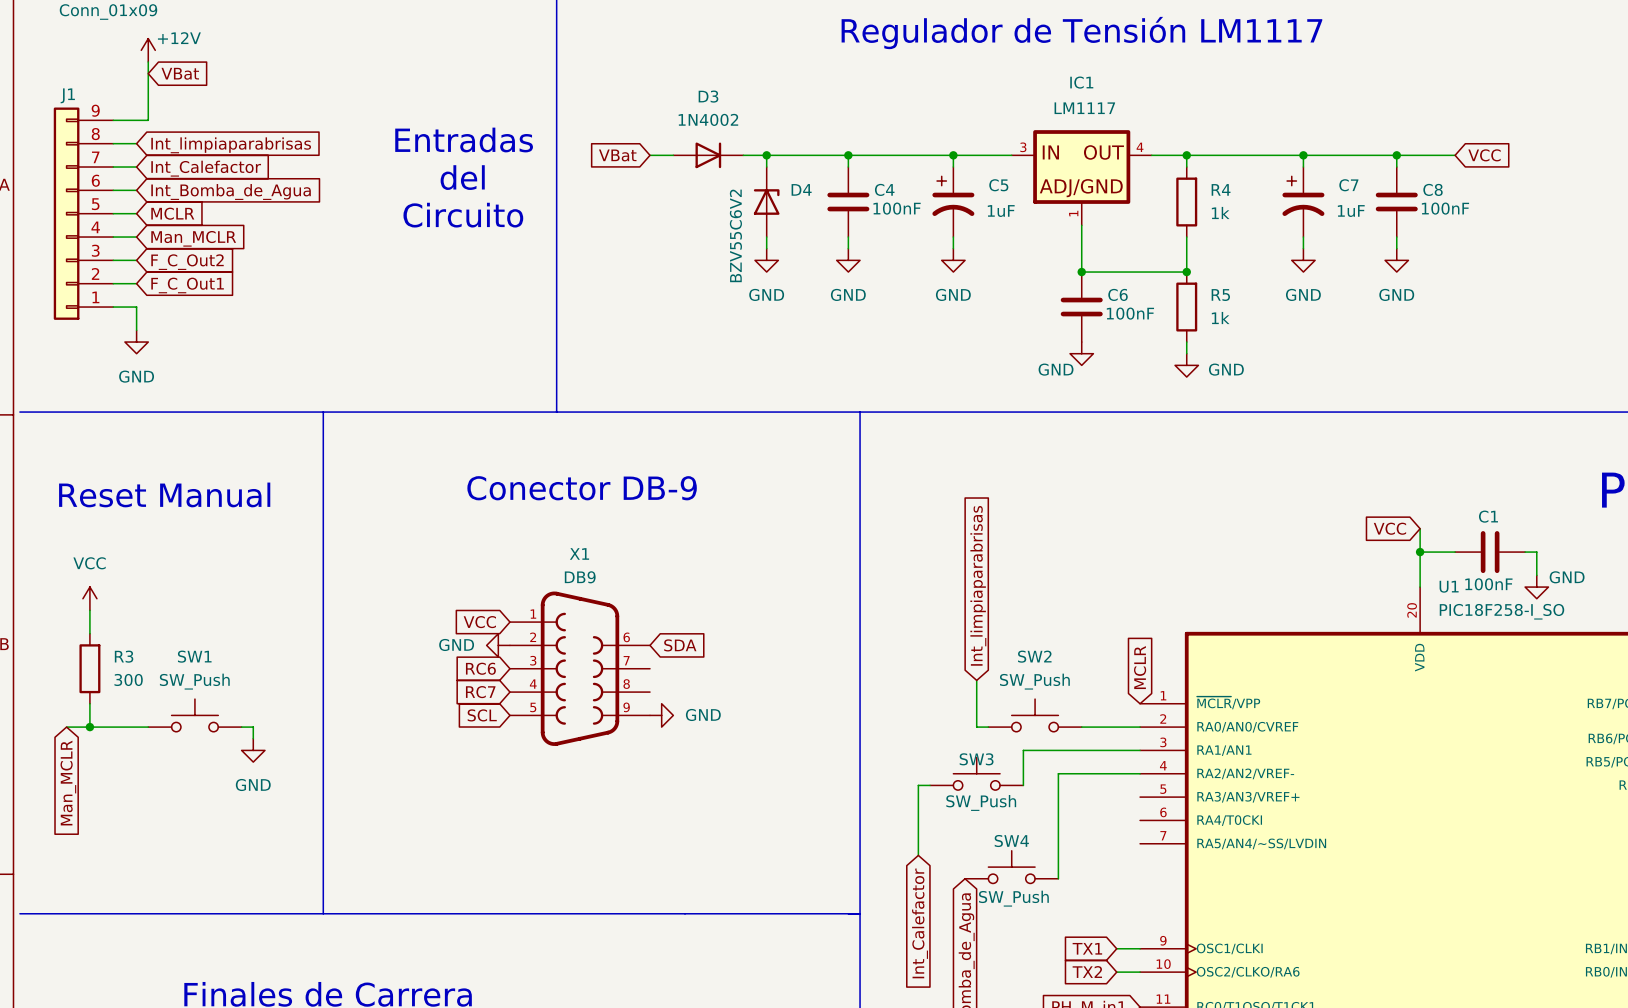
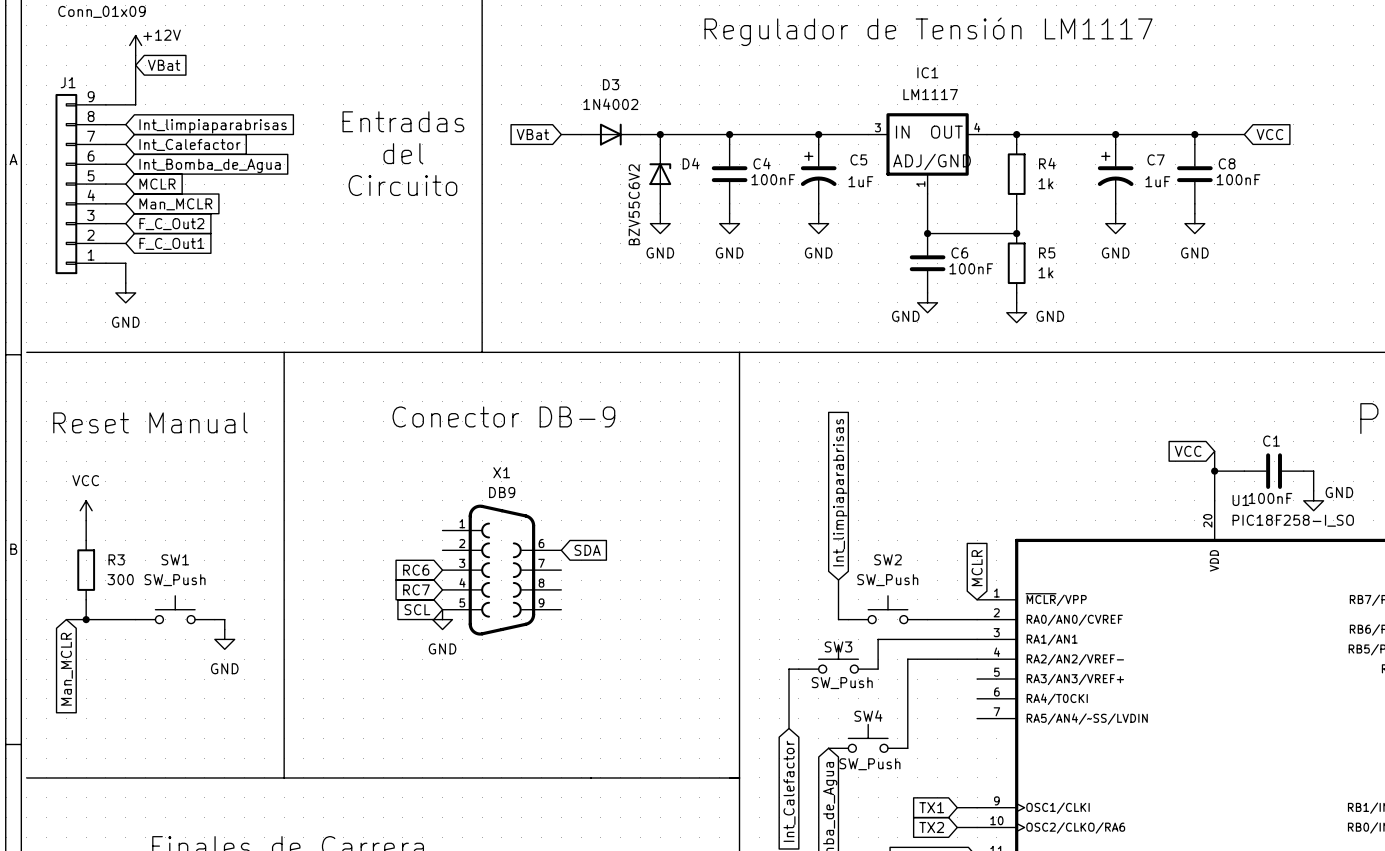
global label: VCC (479, 622) -> none
power symbol: GND (498, 645) -> none
power symbol: GND (661, 715) -> none
power symbol: none -> GND (442, 619)

